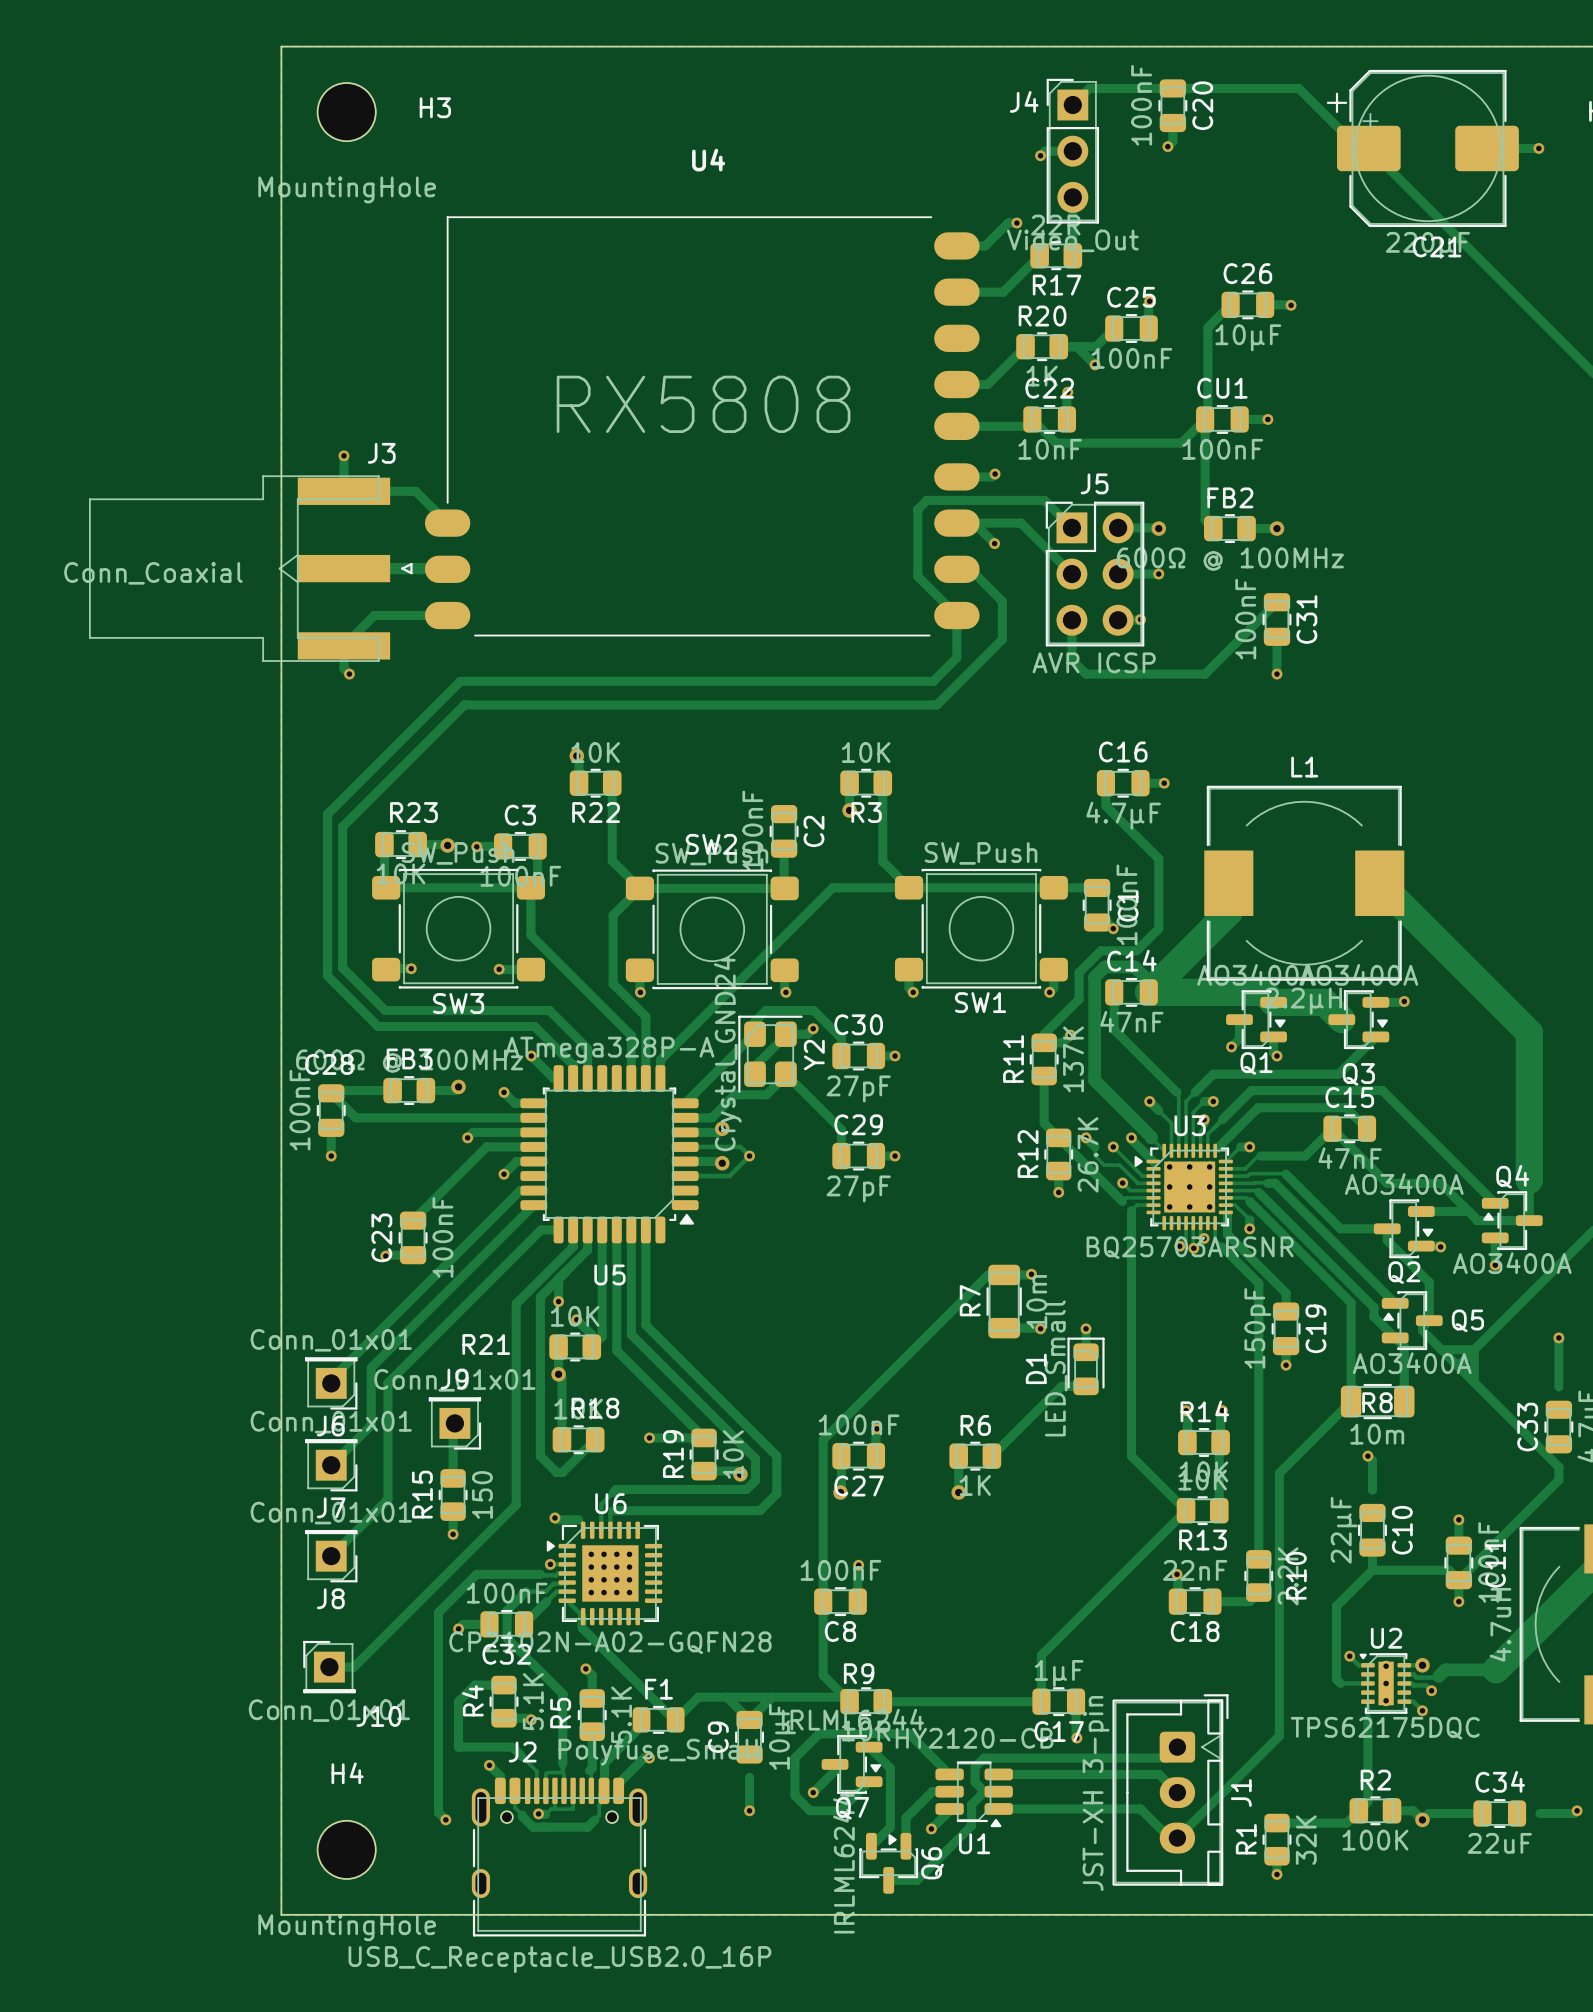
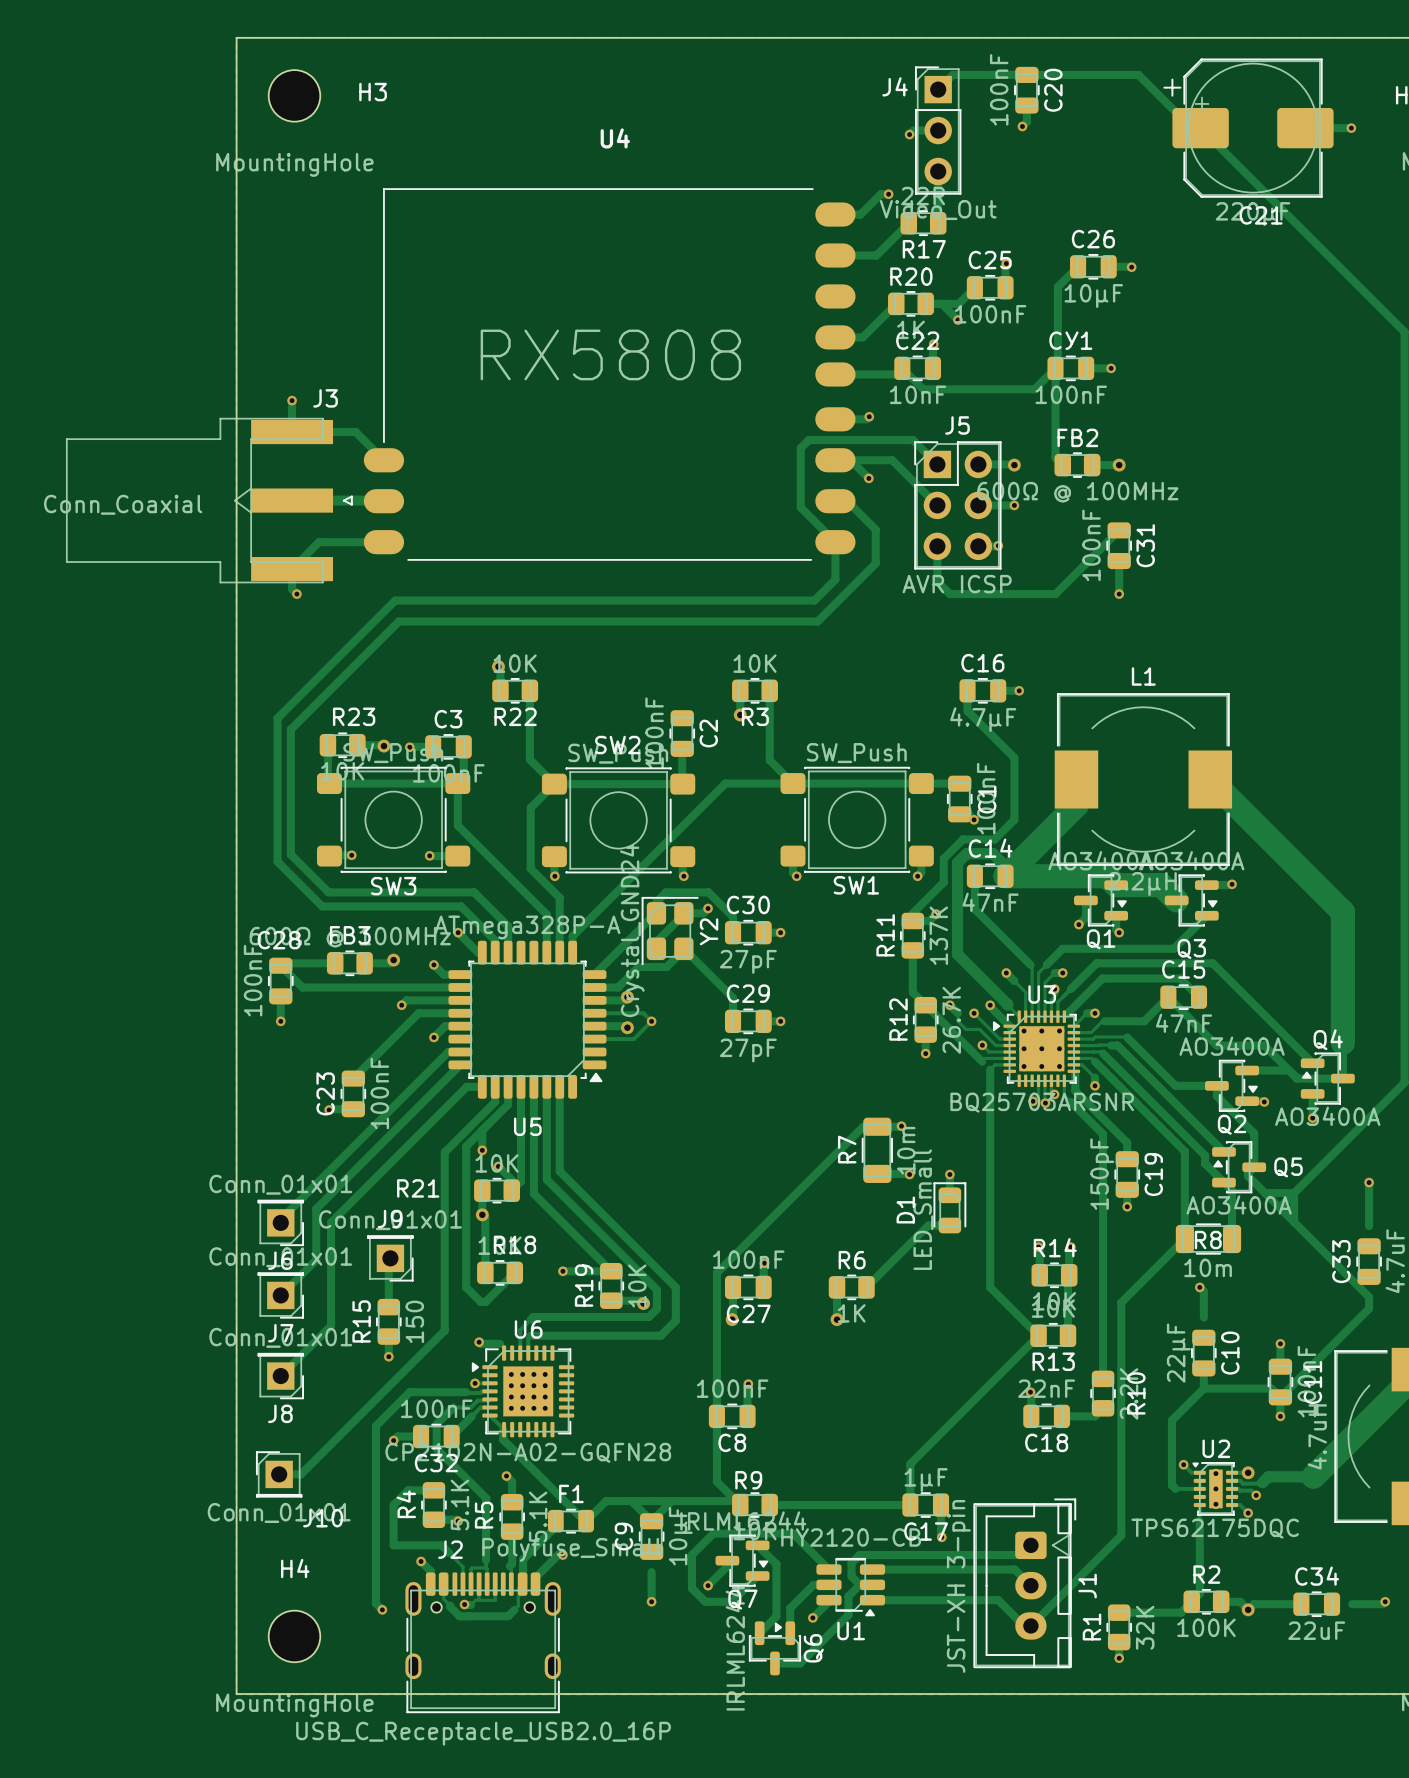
CU1 name: CU1 (1222, 388) -> CУ1 (1070, 340)

